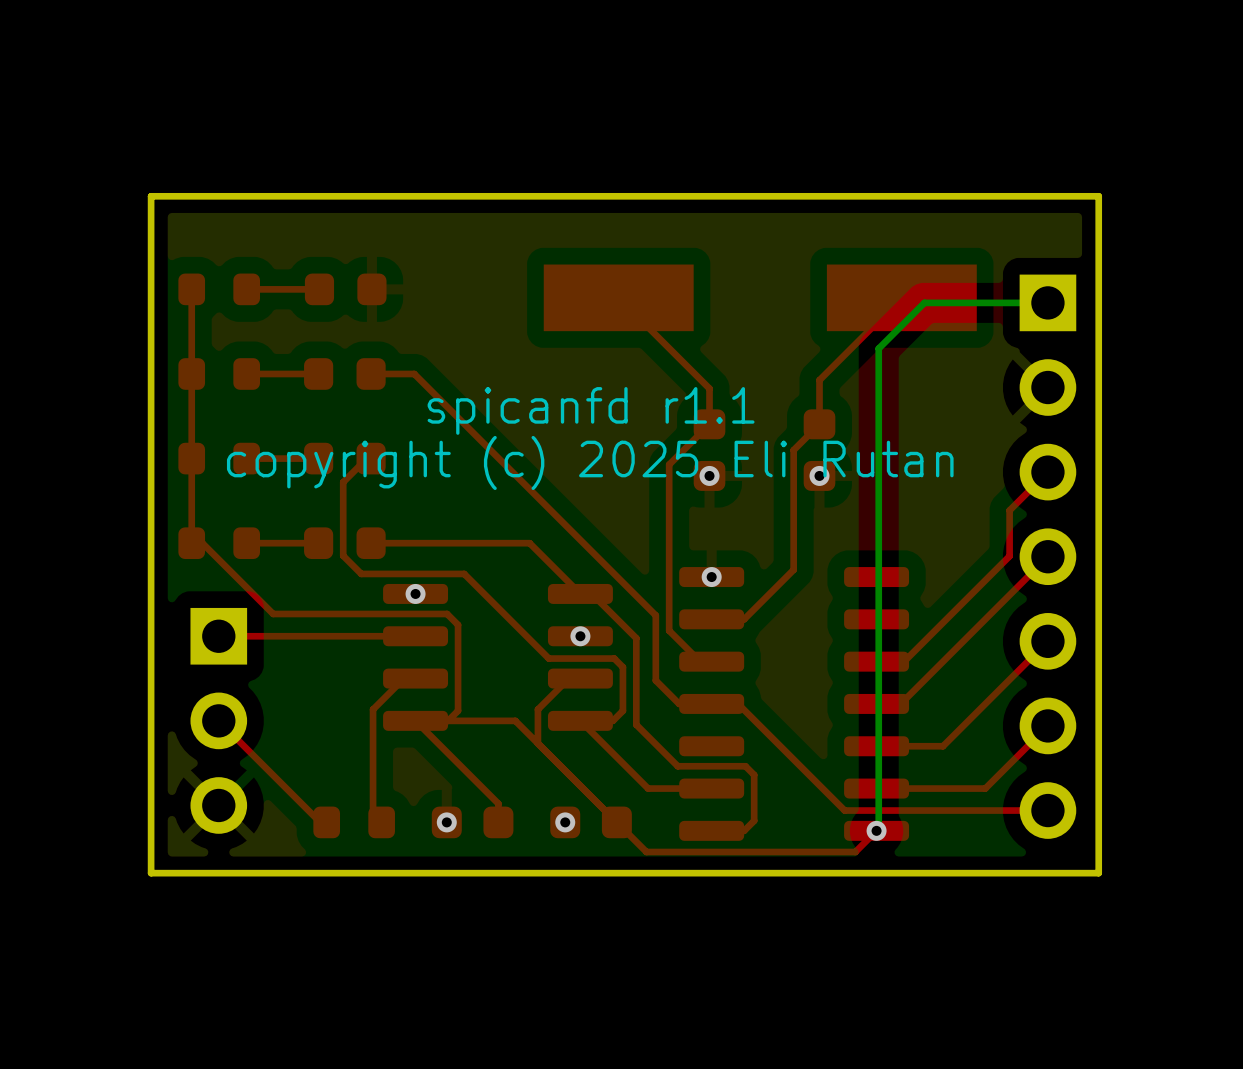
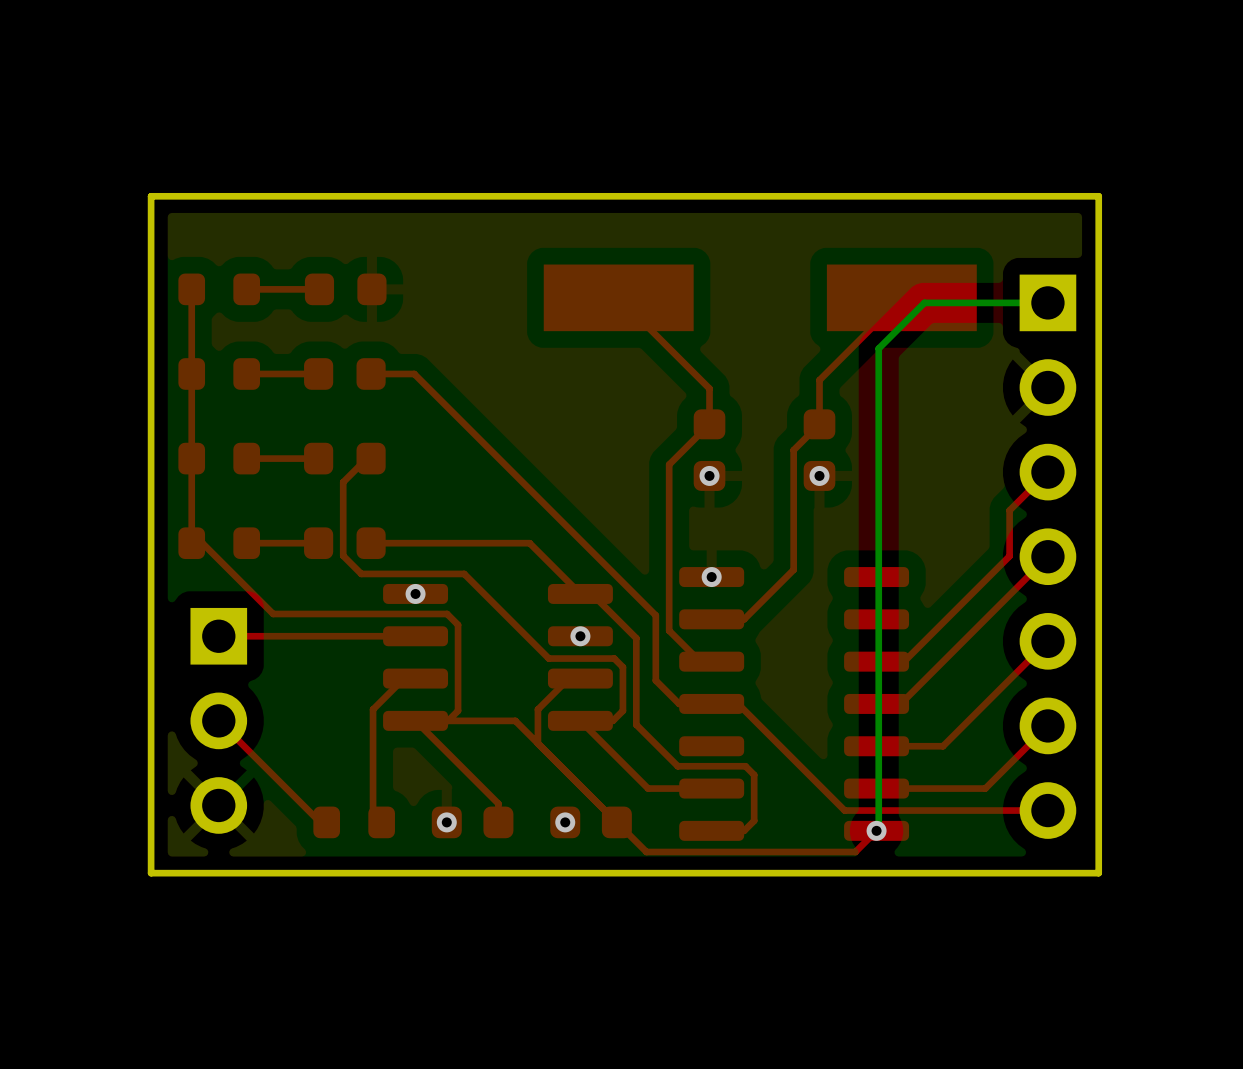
text: spicanfd r1.1 (591, 410) -> none
text: copyright (c) 2025 Eli Rutan (590, 462) -> none

